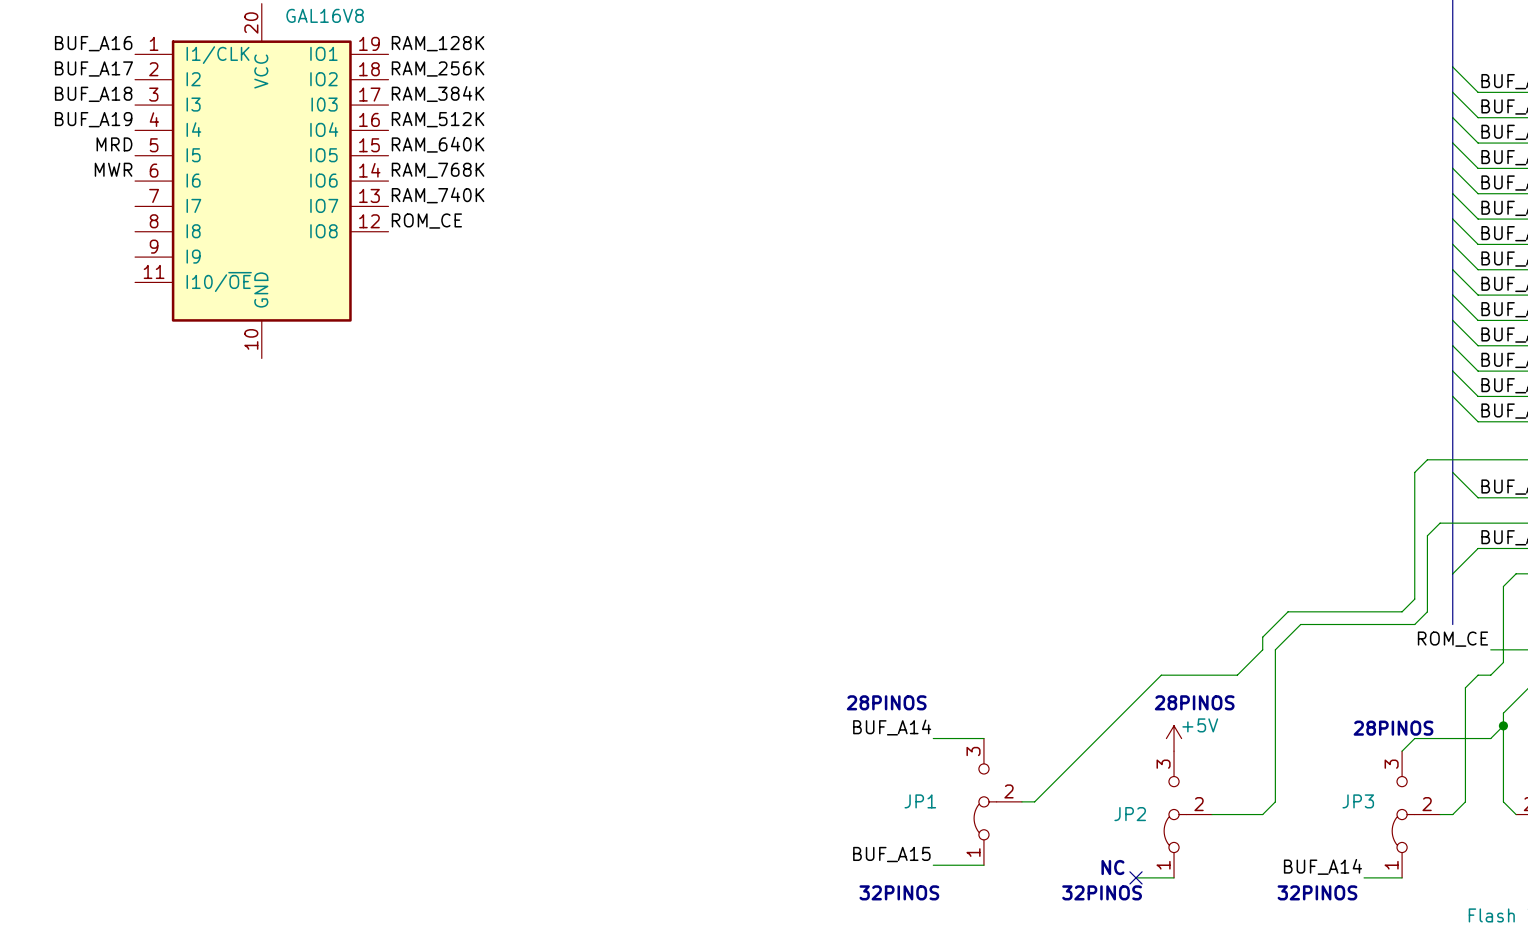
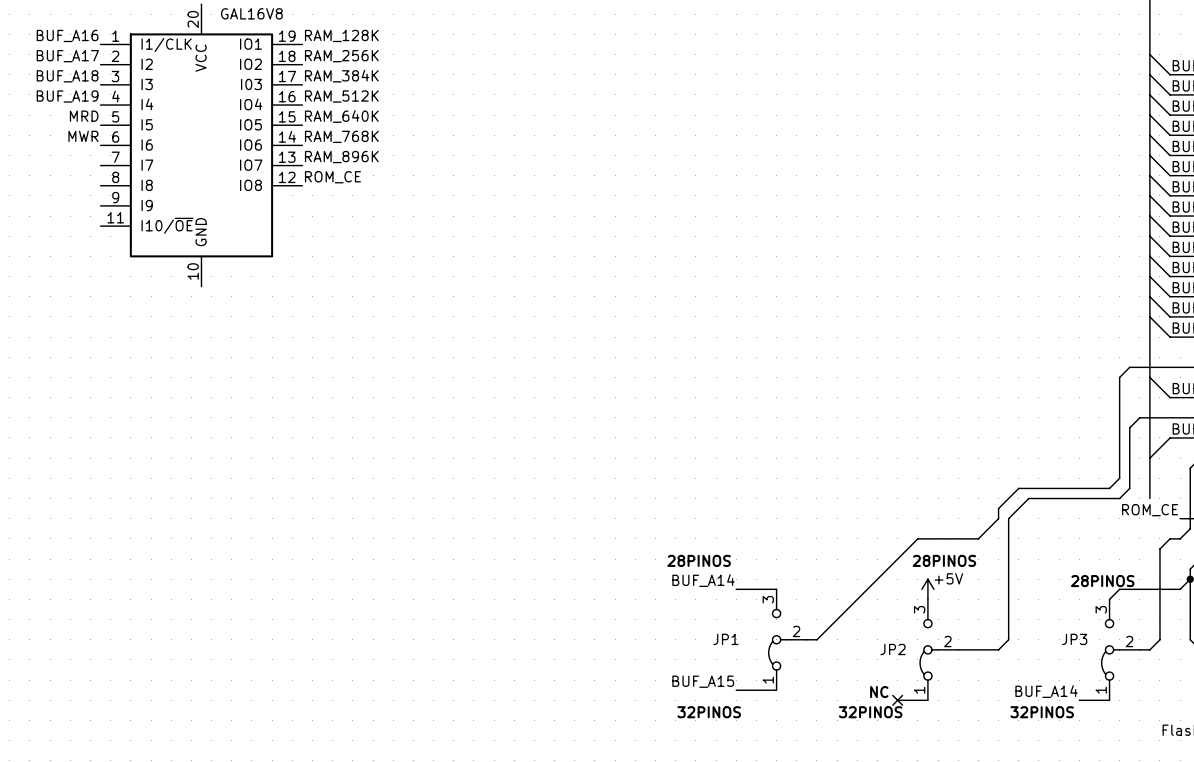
label: RAM_740K (438, 195) -> RAM_896K (341, 157)

